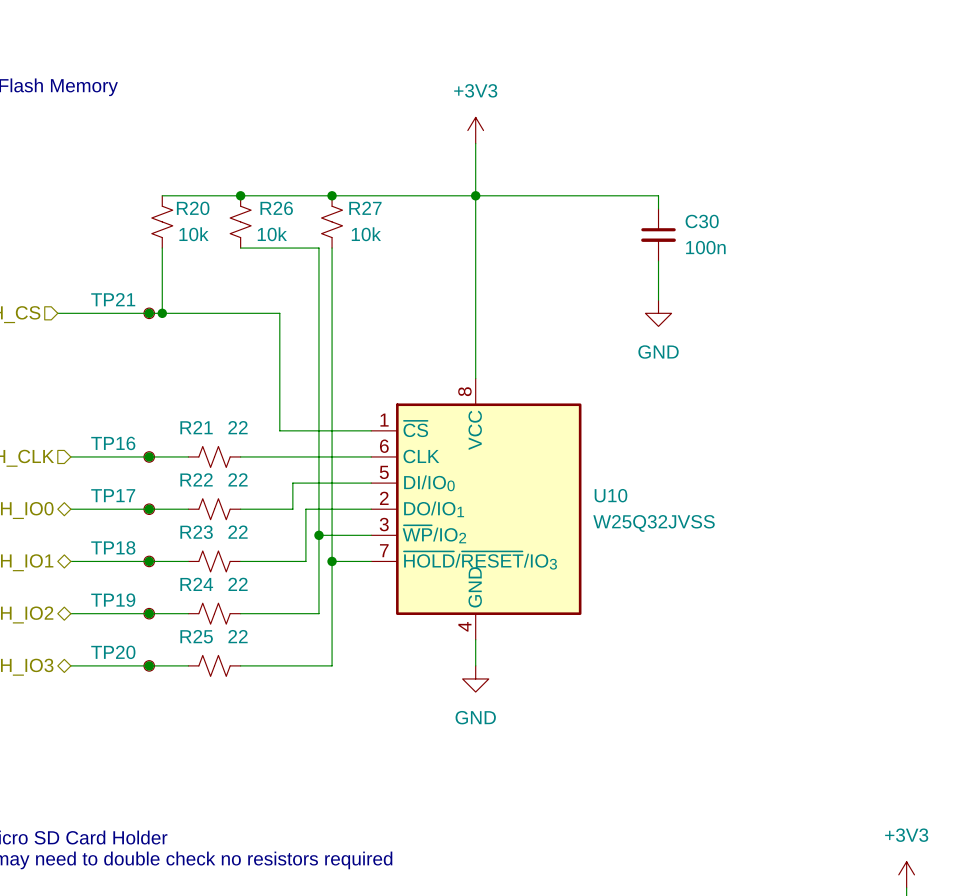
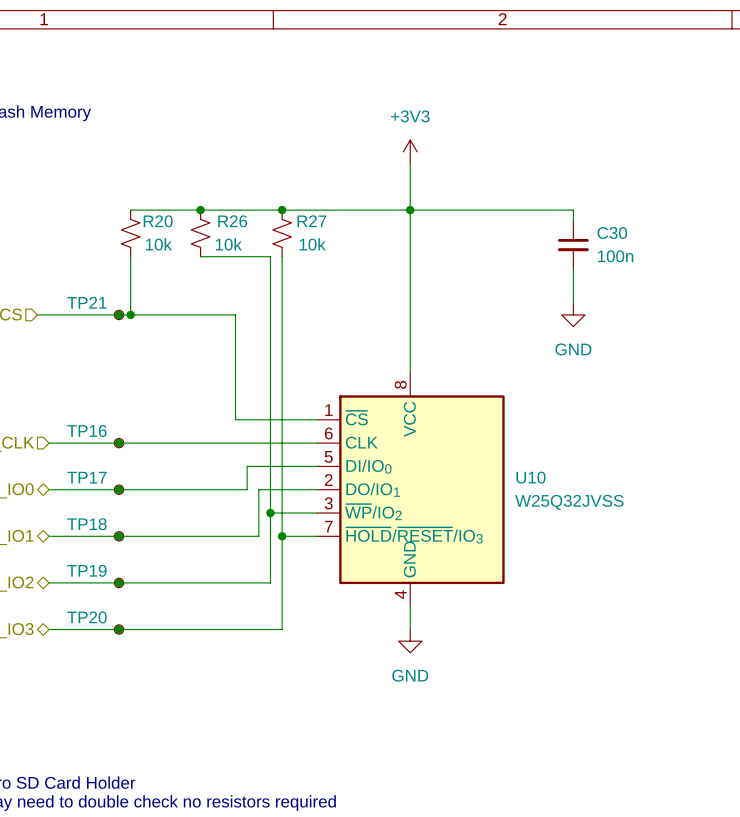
wire: none -> (153, 443) (200, 443)
R21: 22 (214, 456) -> none
wire: none -> (153, 489) (200, 489)
R22: 22 (214, 509) -> none
wire: none -> (153, 536) (200, 536)
R23: 22 (214, 561) -> none
wire: none -> (153, 582) (200, 582)
R24: 22 (214, 613) -> none
wire: none -> (153, 629) (200, 629)
R25: 22 (214, 665) -> none

